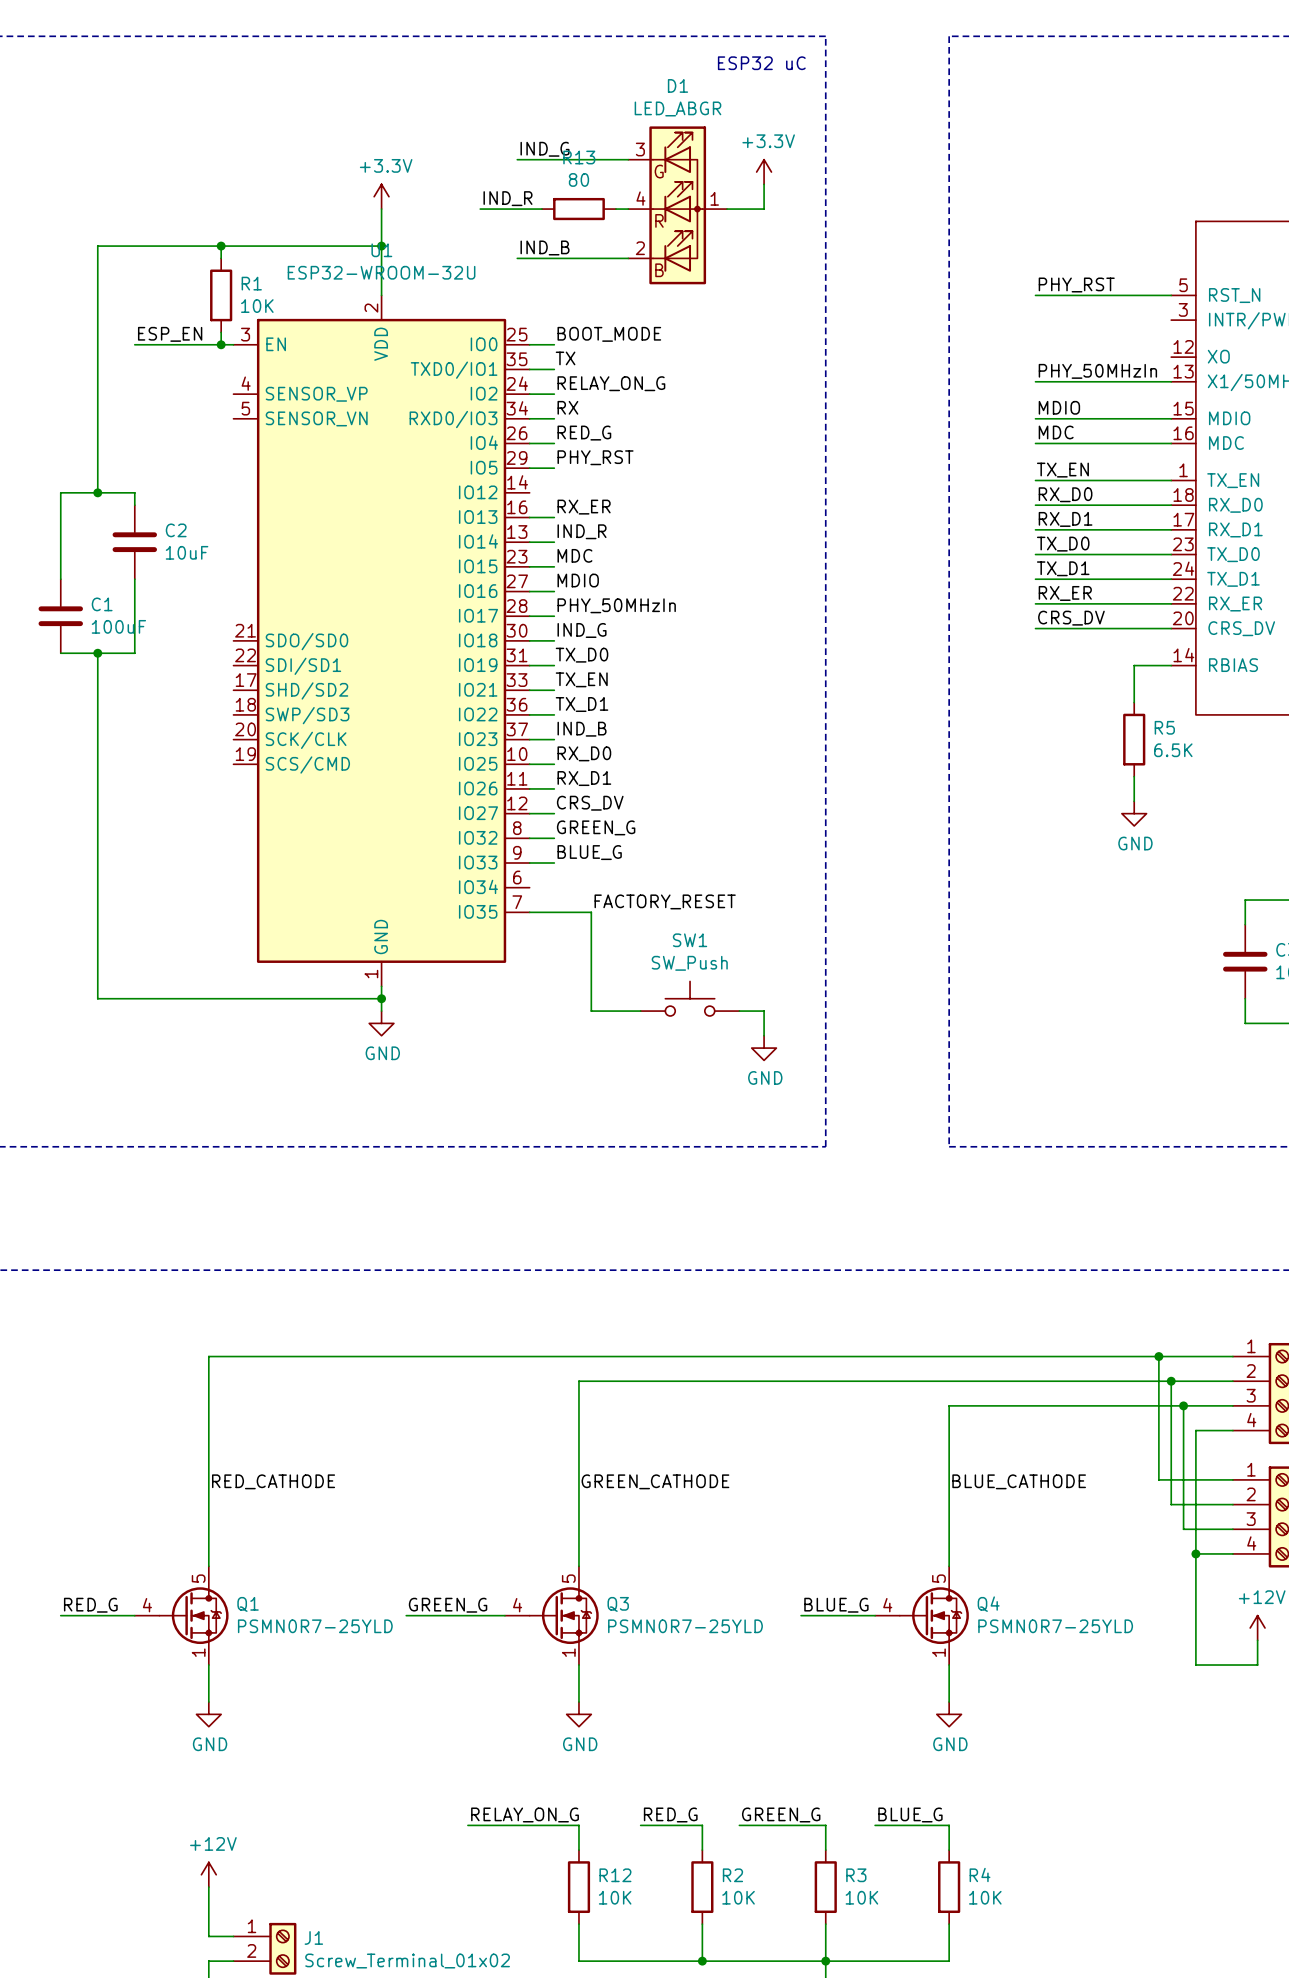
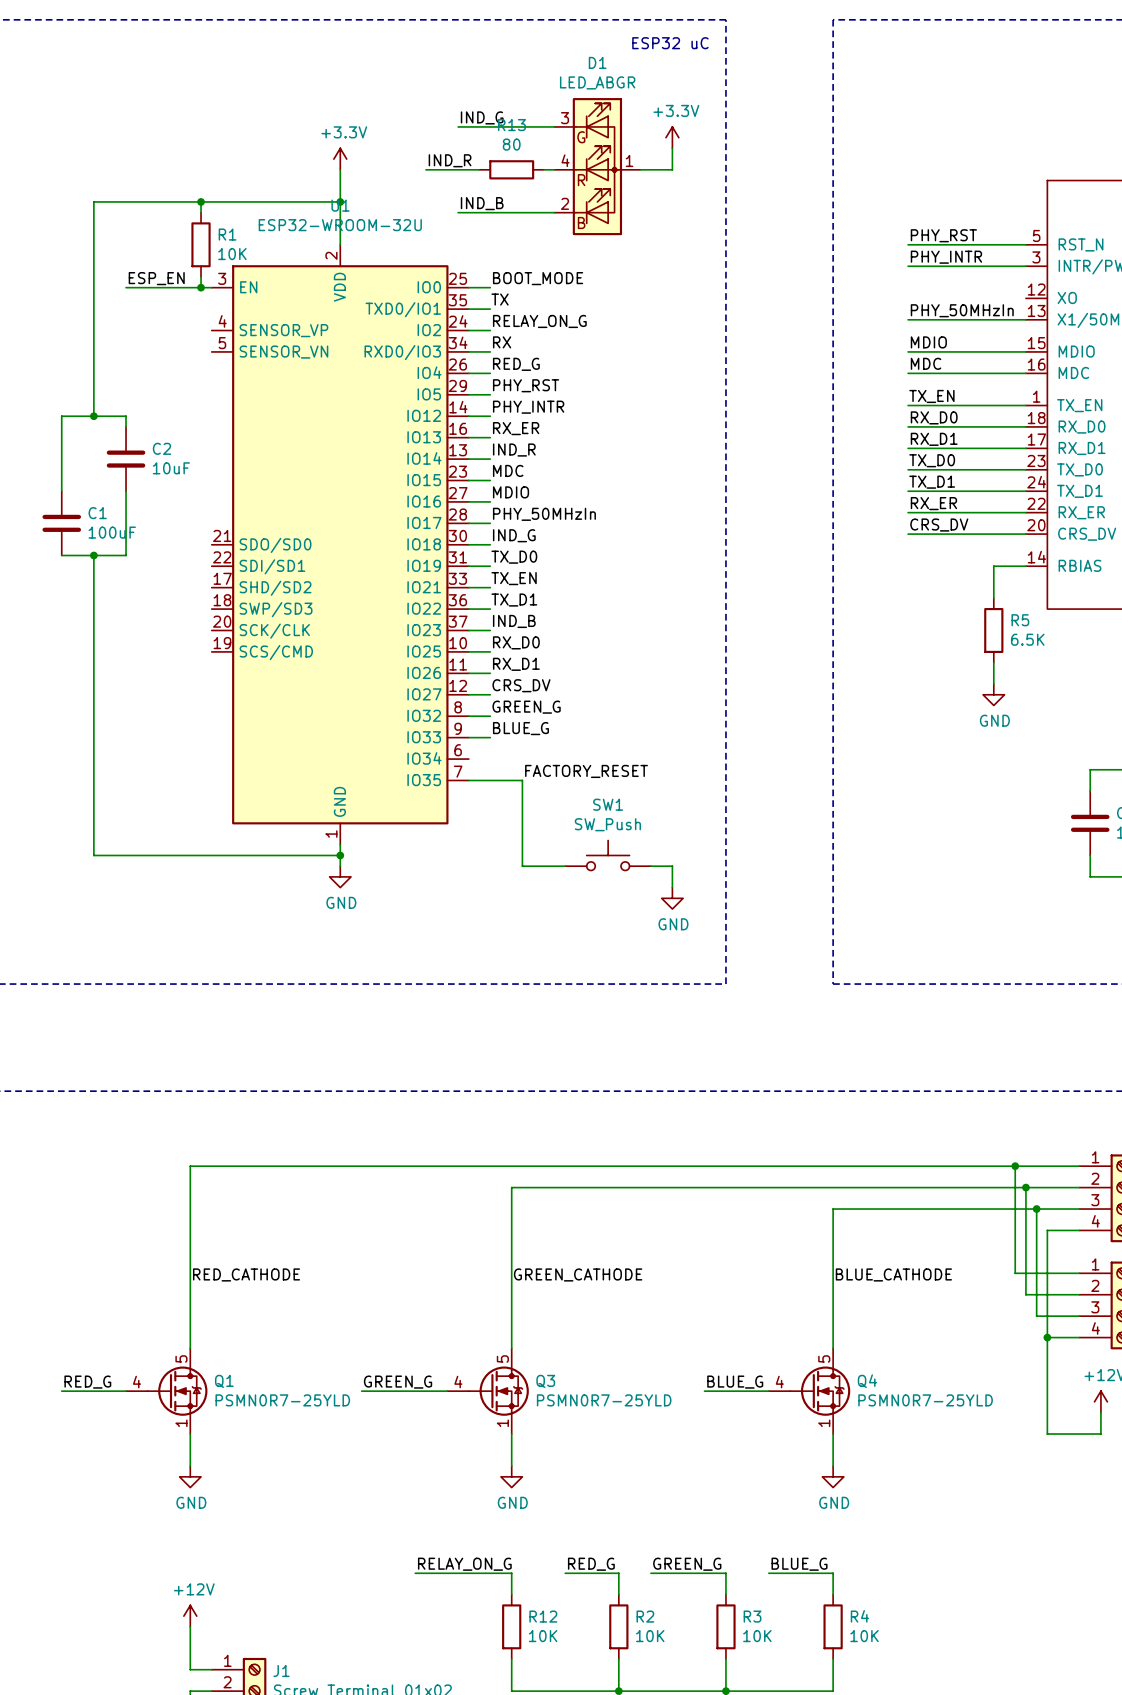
label: none -> PHY_INTR (946, 257)
wire: none -> (908, 266) (1025, 266)
label: none -> PHY_INTR (528, 407)
wire: none -> (468, 416) (490, 416)

